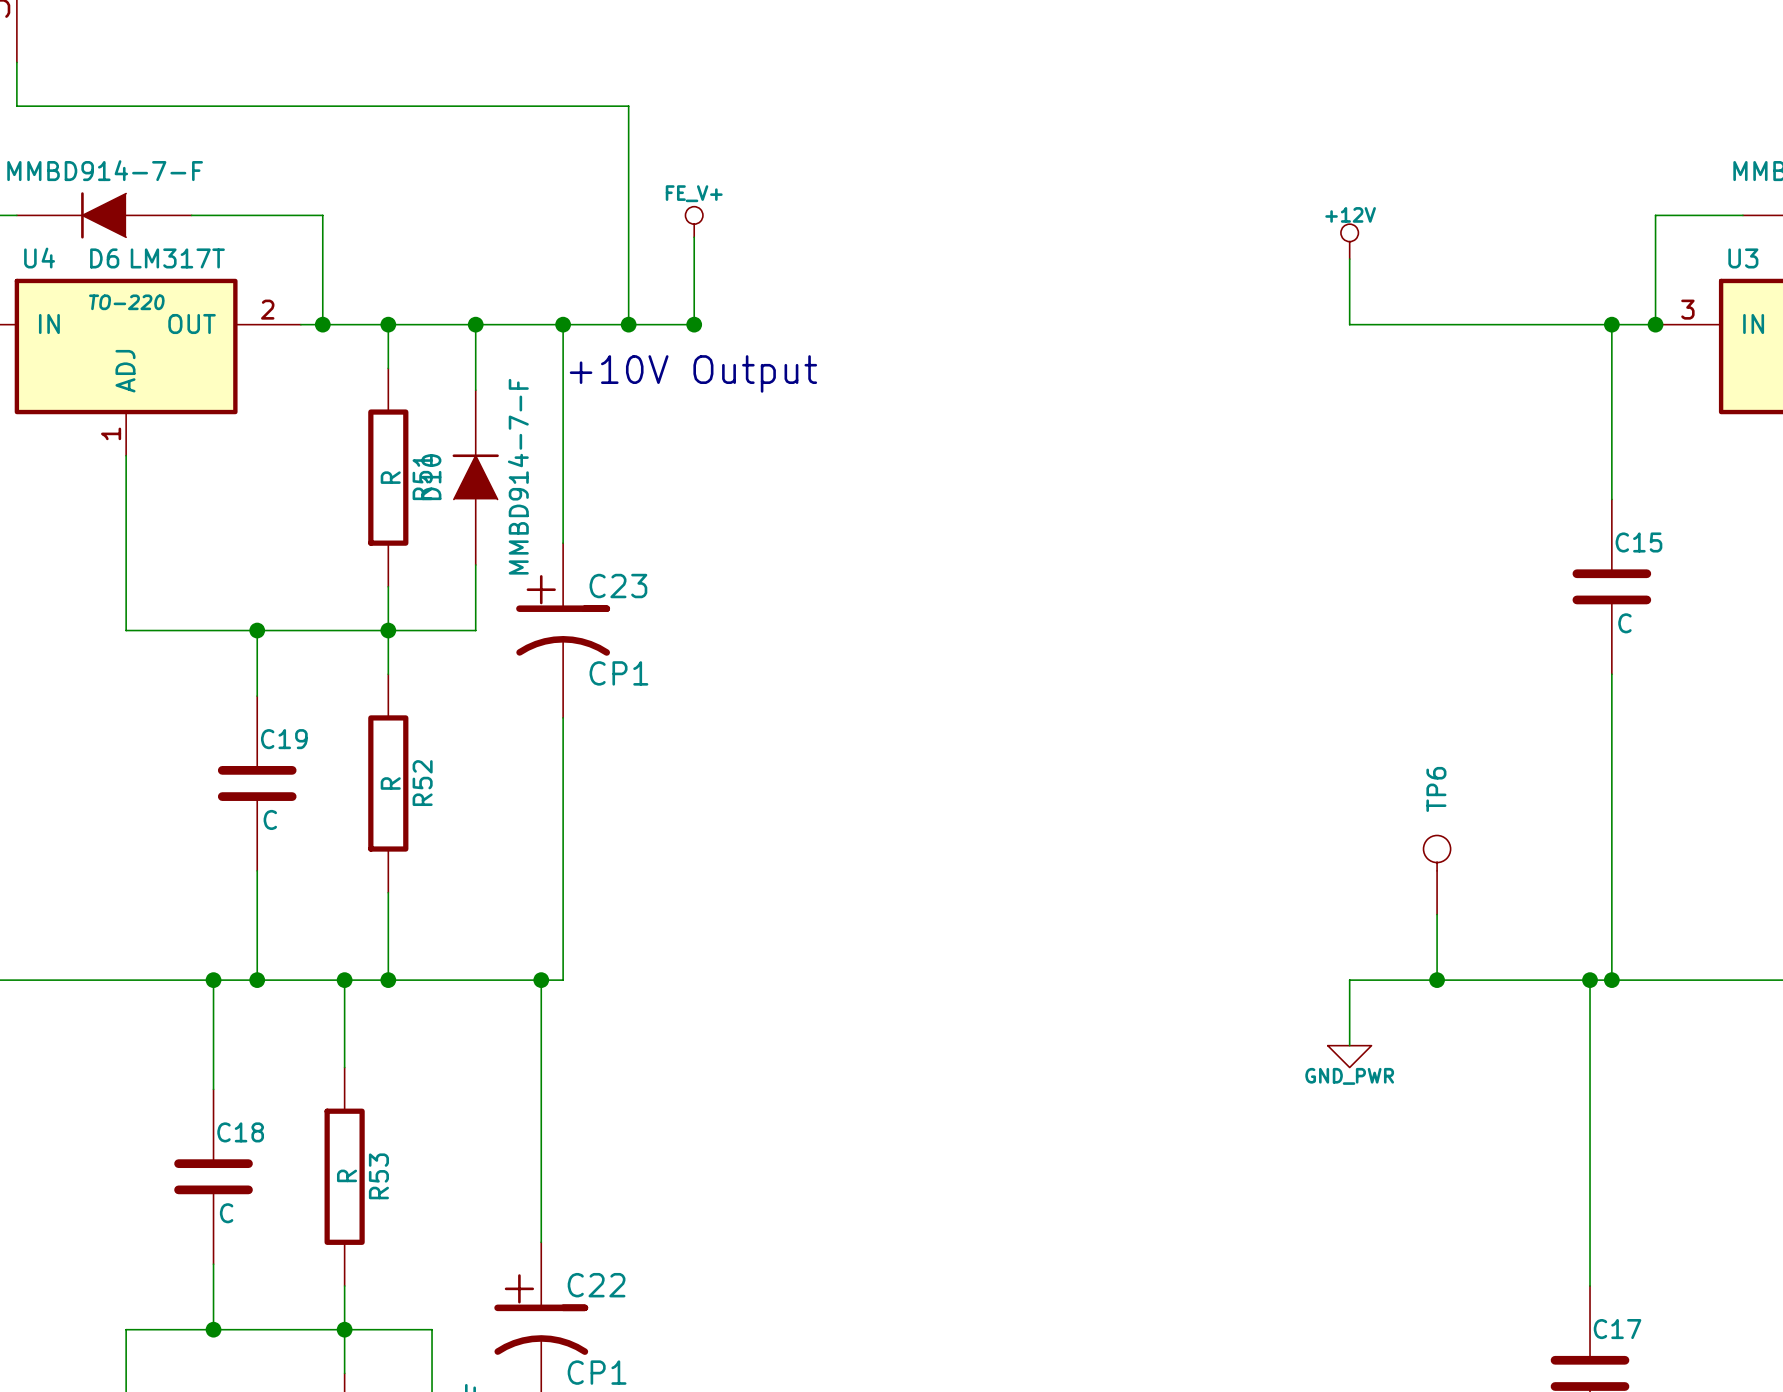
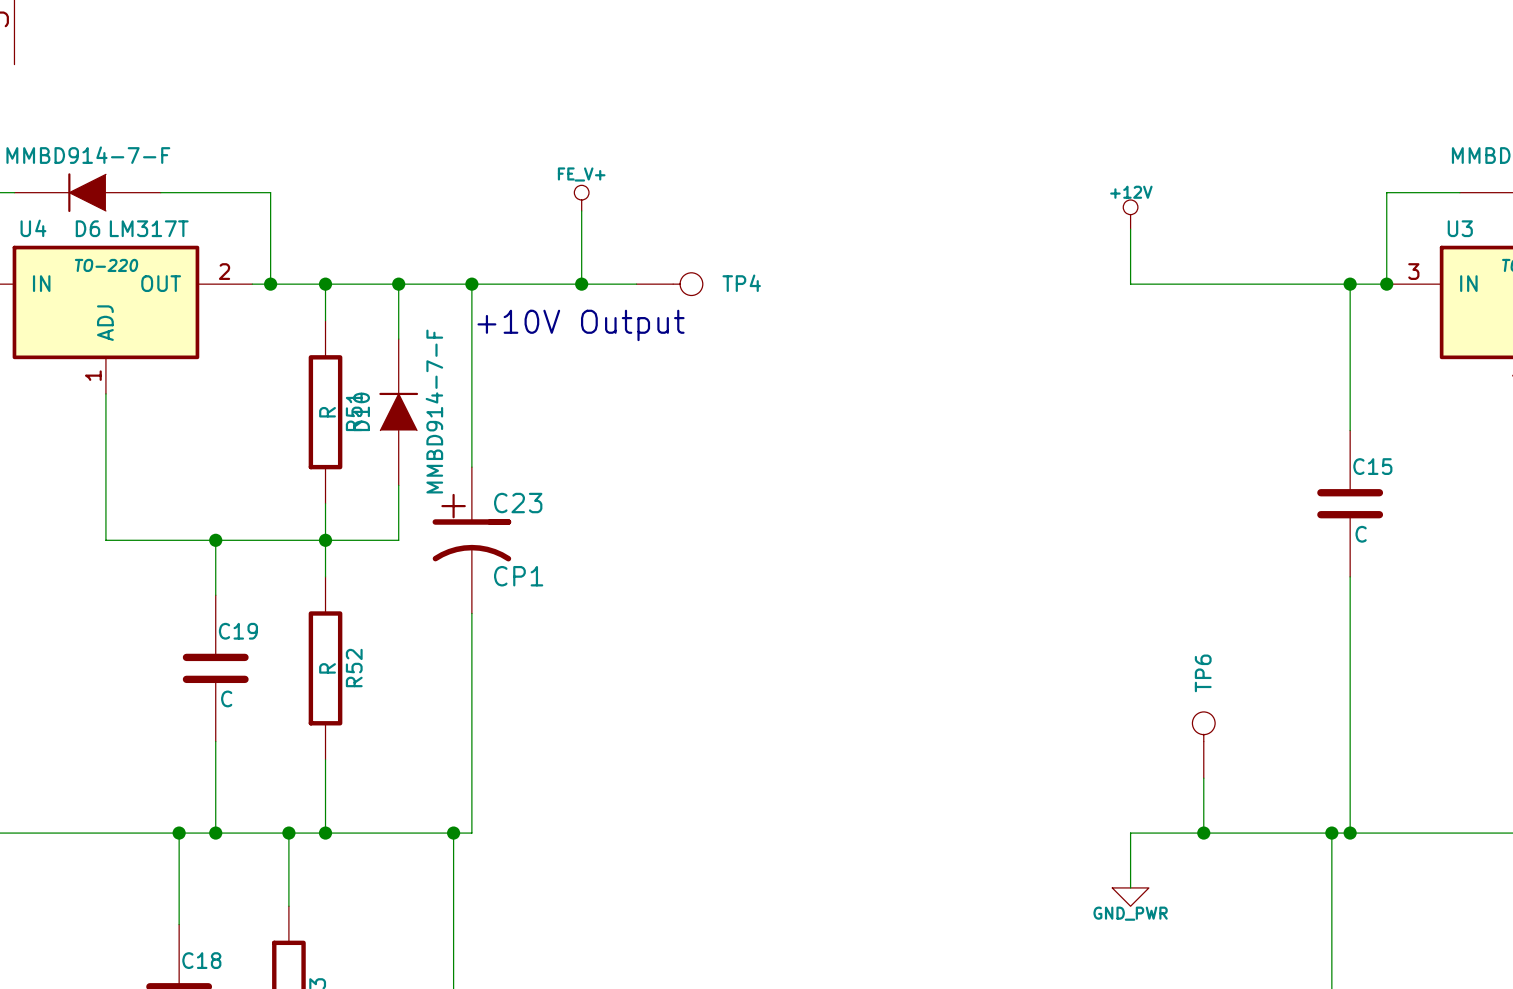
wire: (16, 62) (16, 106) (628, 106) (628, 324) -> none
junction: (628, 324) -> none
wire: none -> (581, 284) (636, 284)
TP4: none -> (669, 284)

